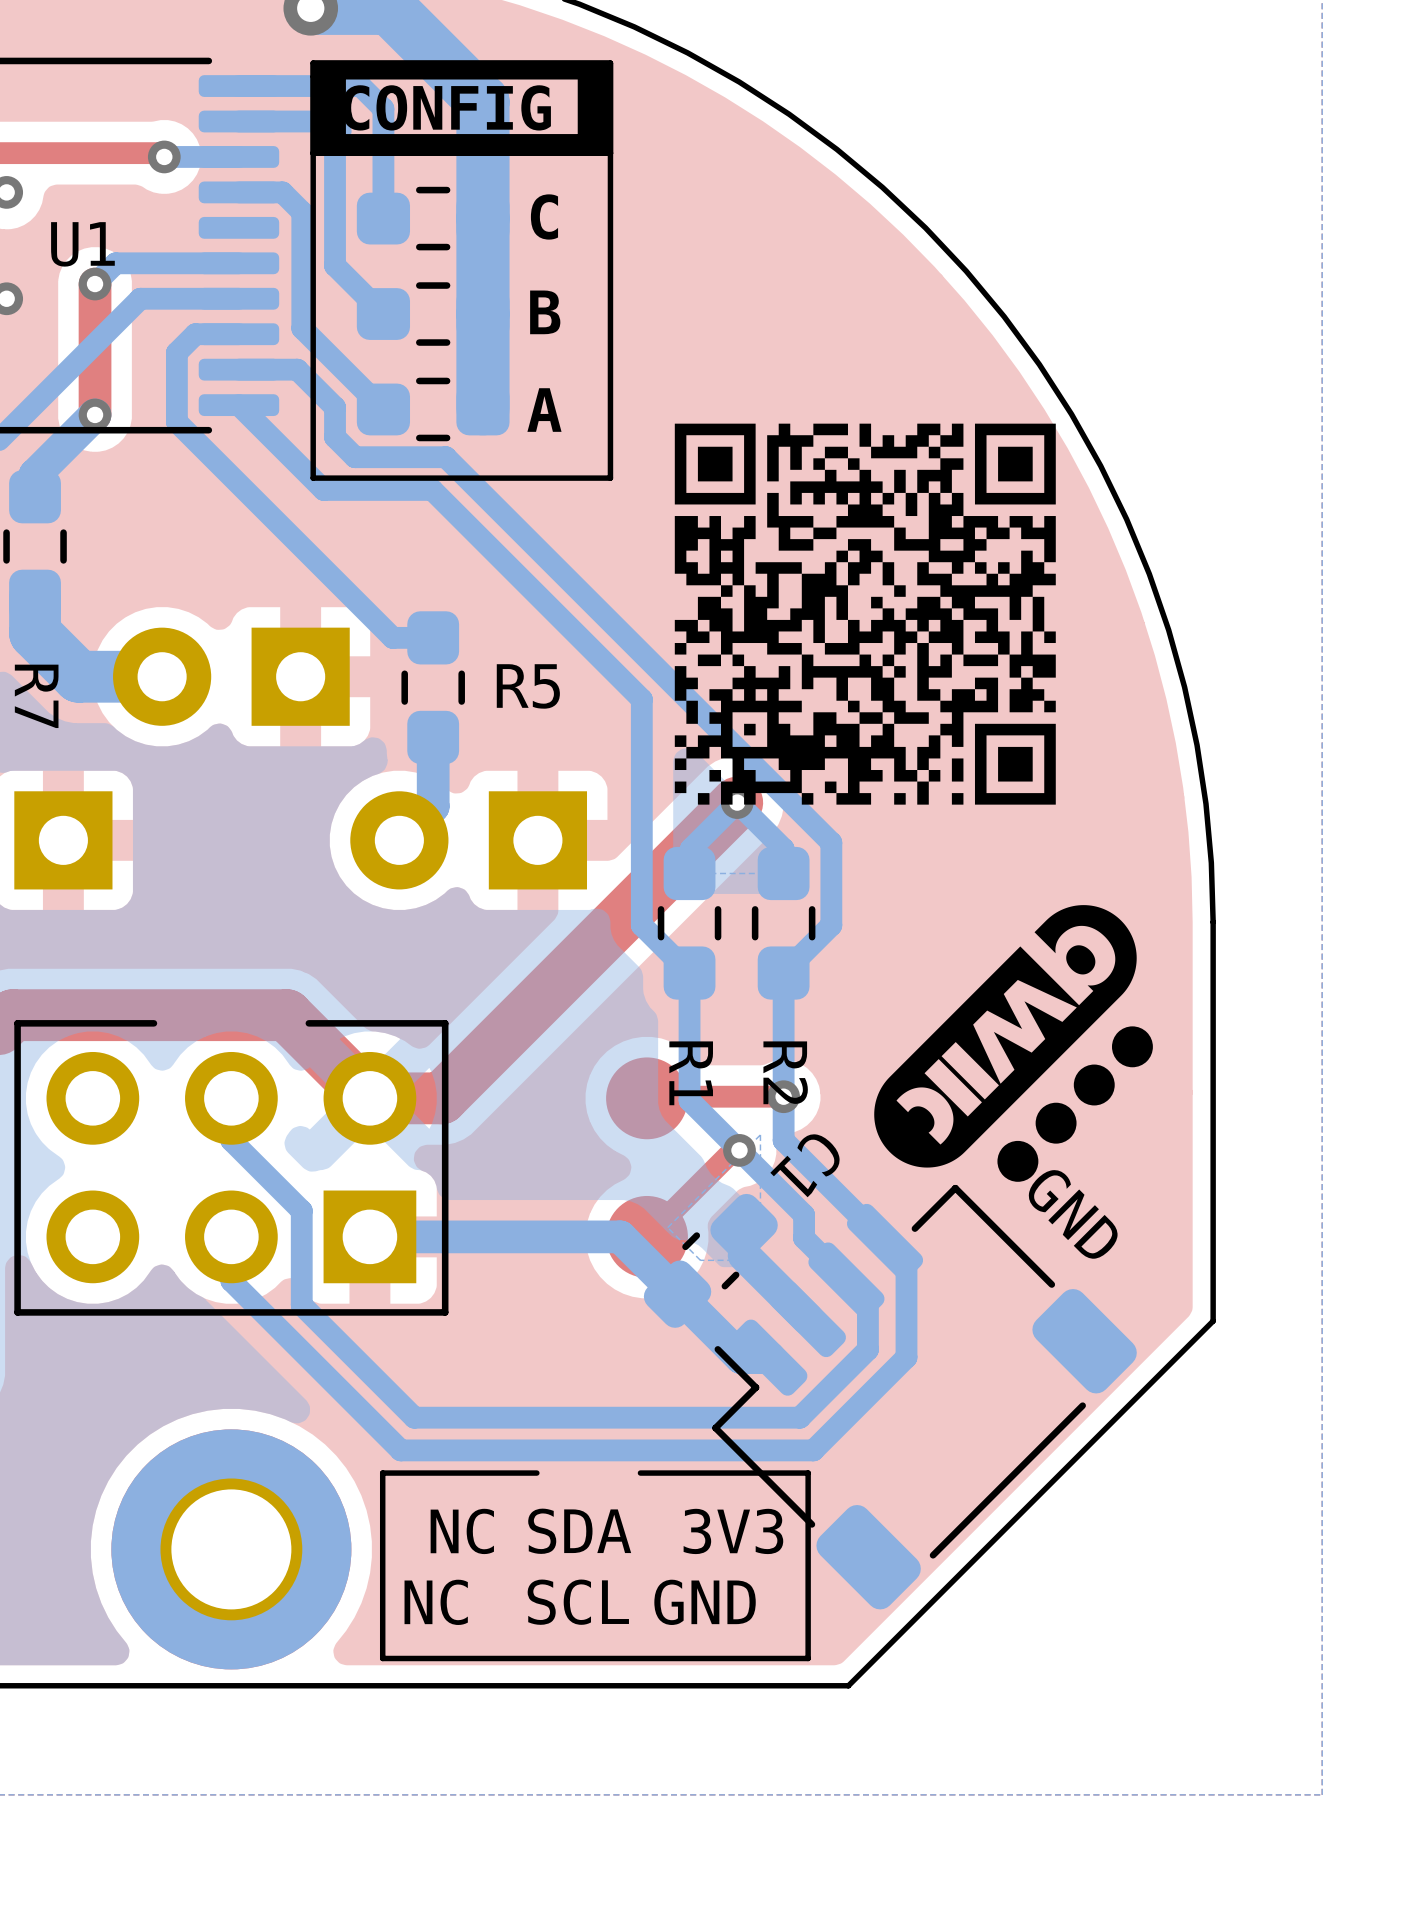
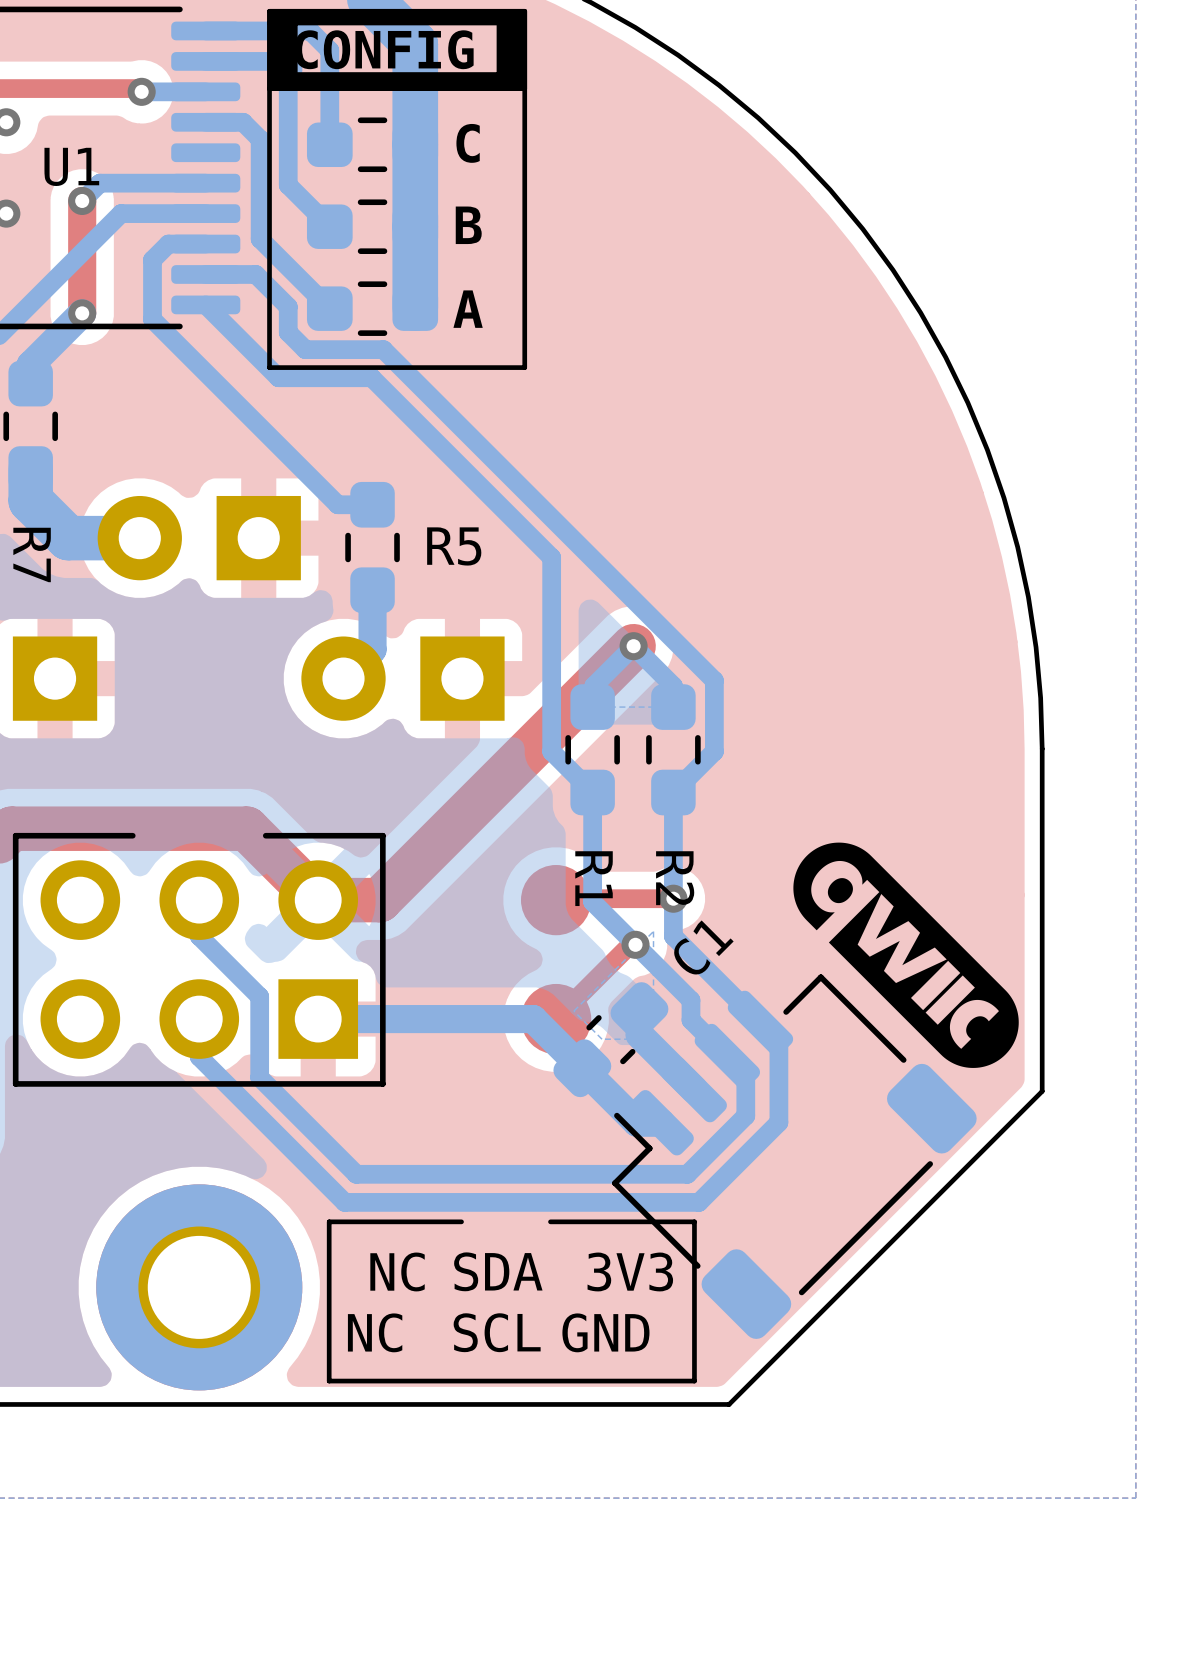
drawing: [674, 423, 1056, 805] -> none
drawing: [874, 905, 1153, 1182] -> none
drawing: none -> [793, 842, 1019, 1068]
C1 name rotation: 0° (805, 1165) -> 180° (703, 947)
text: GND (1072, 1214) -> none

